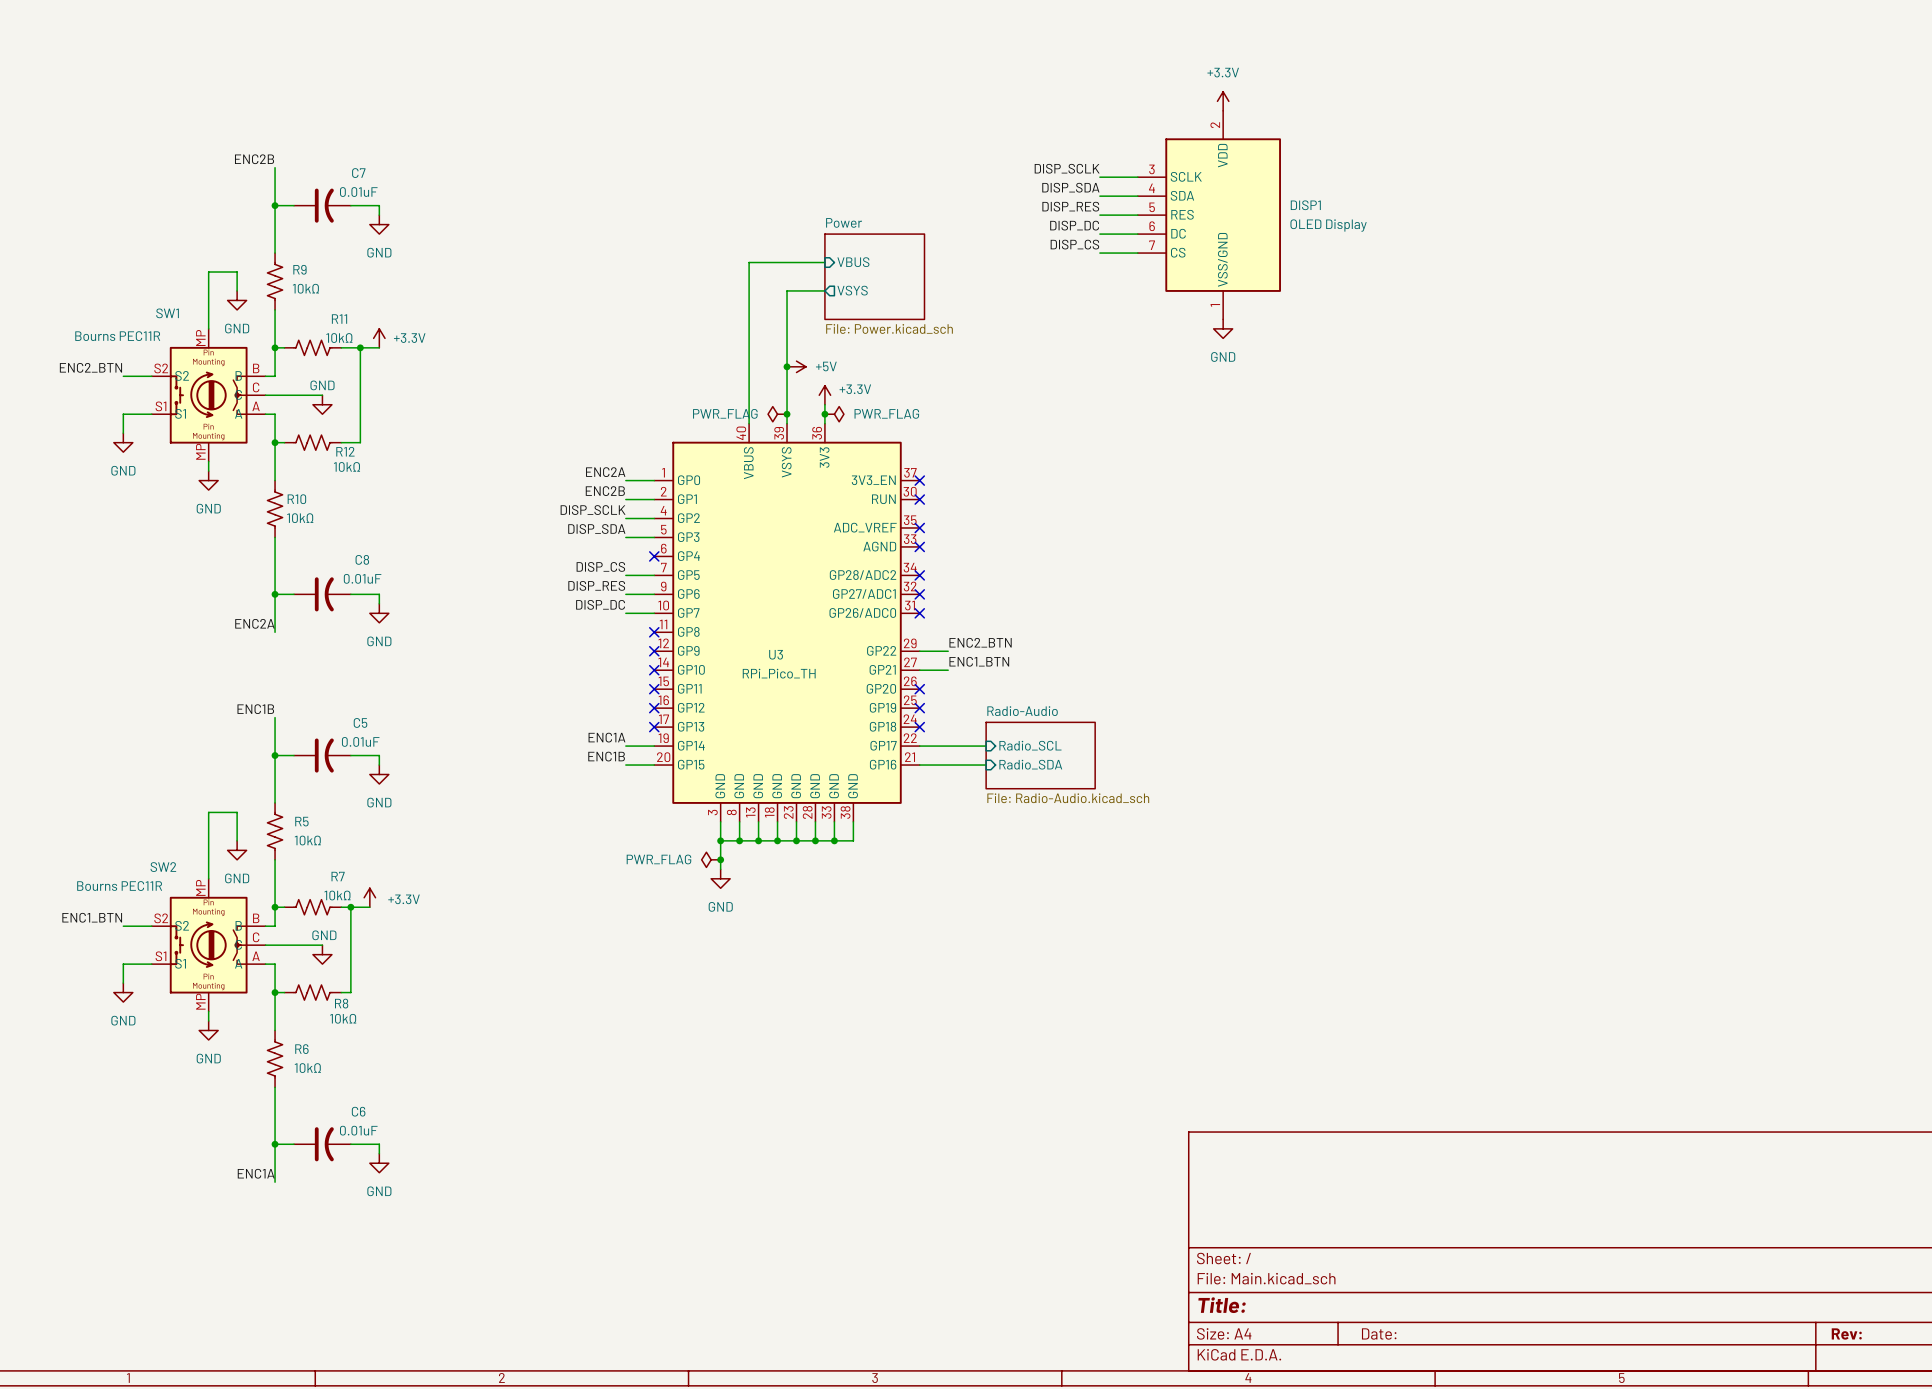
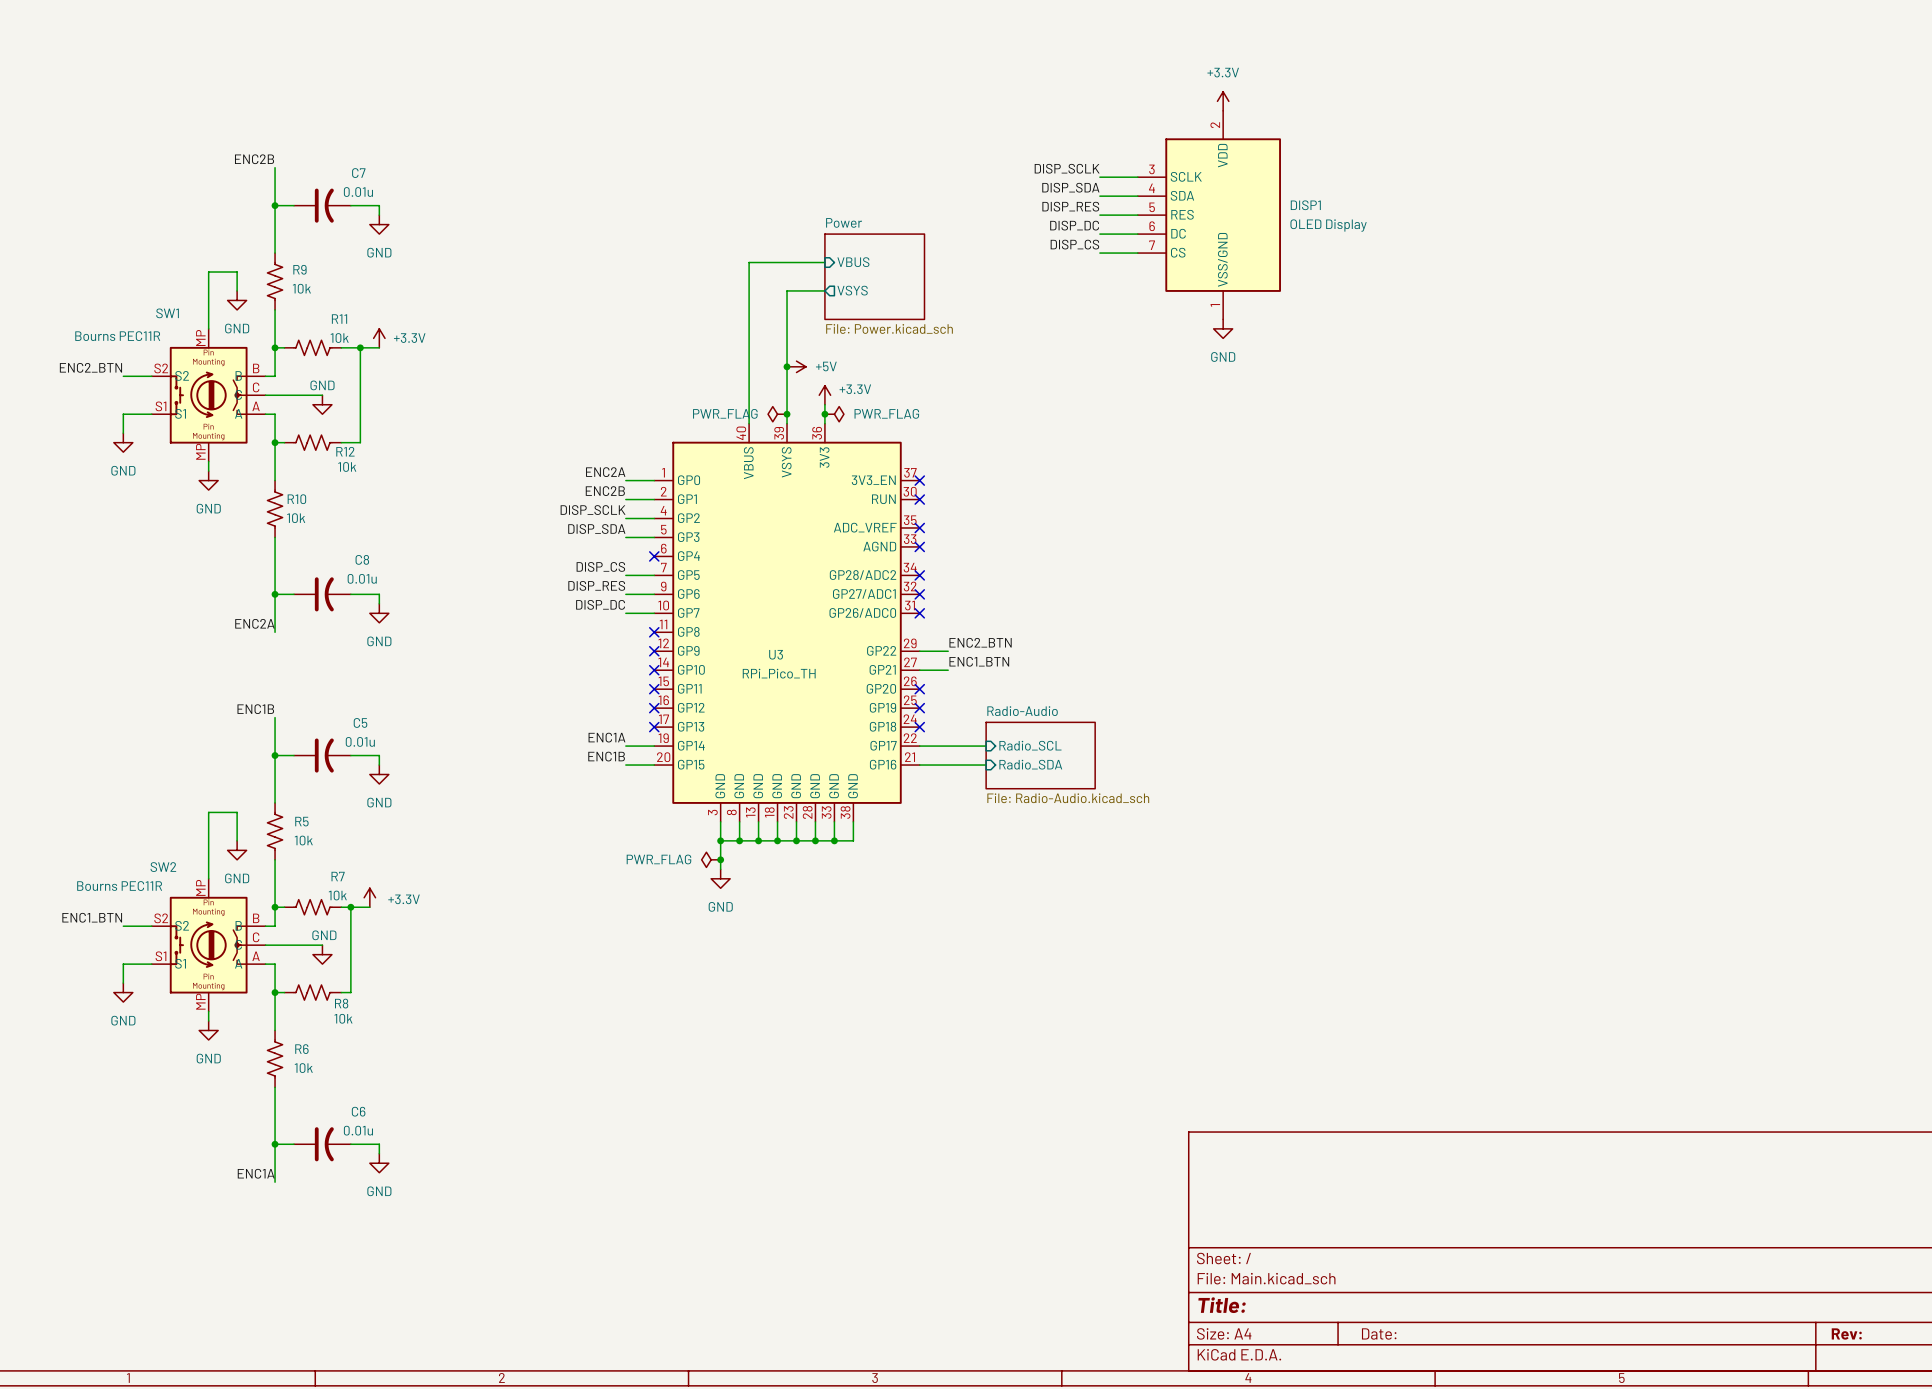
C7 value: 0.01uF (358, 192) -> 0.01u (358, 192)
R9 value: 10kΩ (305, 288) -> 10k (301, 288)
R11 value: 10kΩ (339, 338) -> 10k (339, 338)
R12 value: 10kΩ (346, 466) -> 10k (347, 466)
R10 value: 10kΩ (300, 518) -> 10k (296, 518)
C8 value: 0.01uF (362, 578) -> 0.01u (362, 578)
C5 value: 0.01uF (360, 741) -> 0.01u (360, 741)
R5 value: 10kΩ (307, 840) -> 10k (303, 840)
R7 value: 10kΩ (337, 895) -> 10k (337, 895)
R8 value: 10kΩ (343, 1018) -> 10k (343, 1018)
R6 value: 10kΩ (307, 1068) -> 10k (303, 1068)
C6 value: 0.01uF (358, 1130) -> 0.01u (358, 1130)

